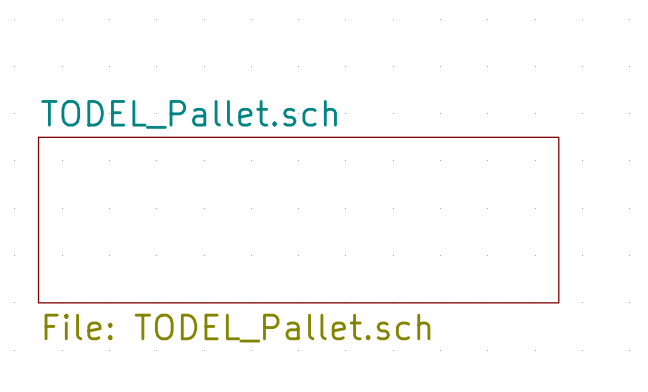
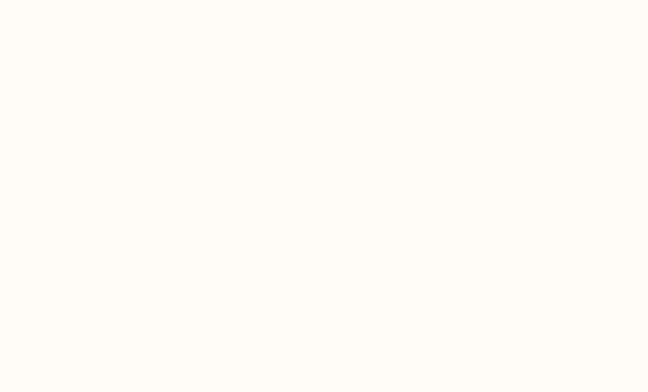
sheet TODEL_Pallet.sch: File: TODEL_Pallet.sch (298, 220) -> none

